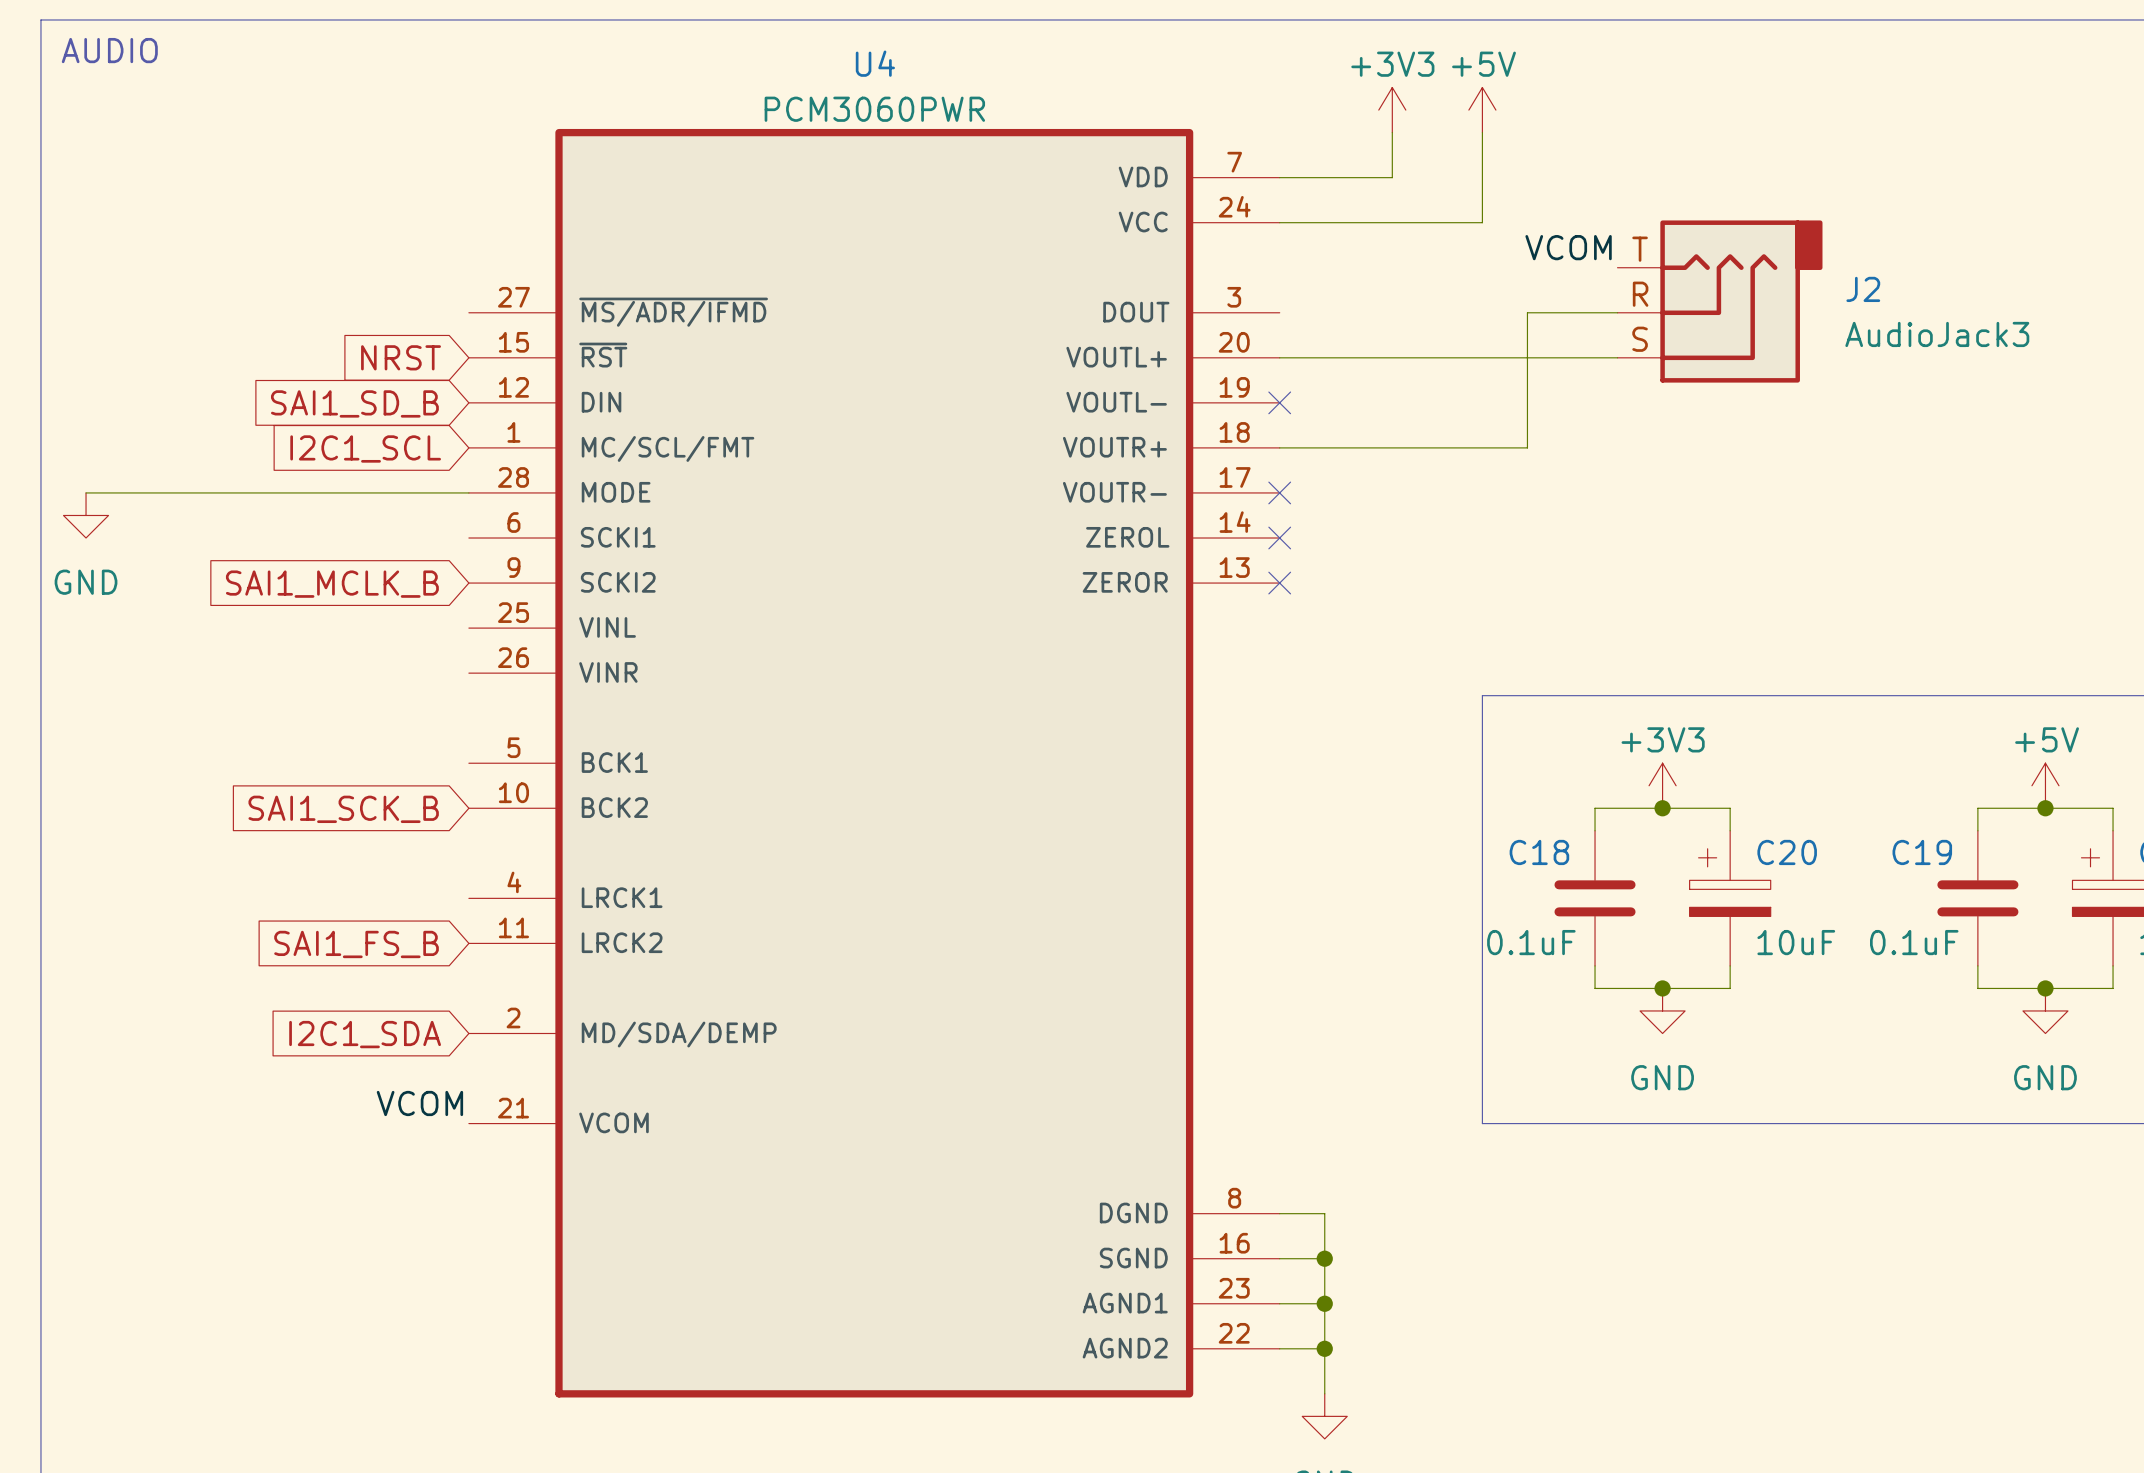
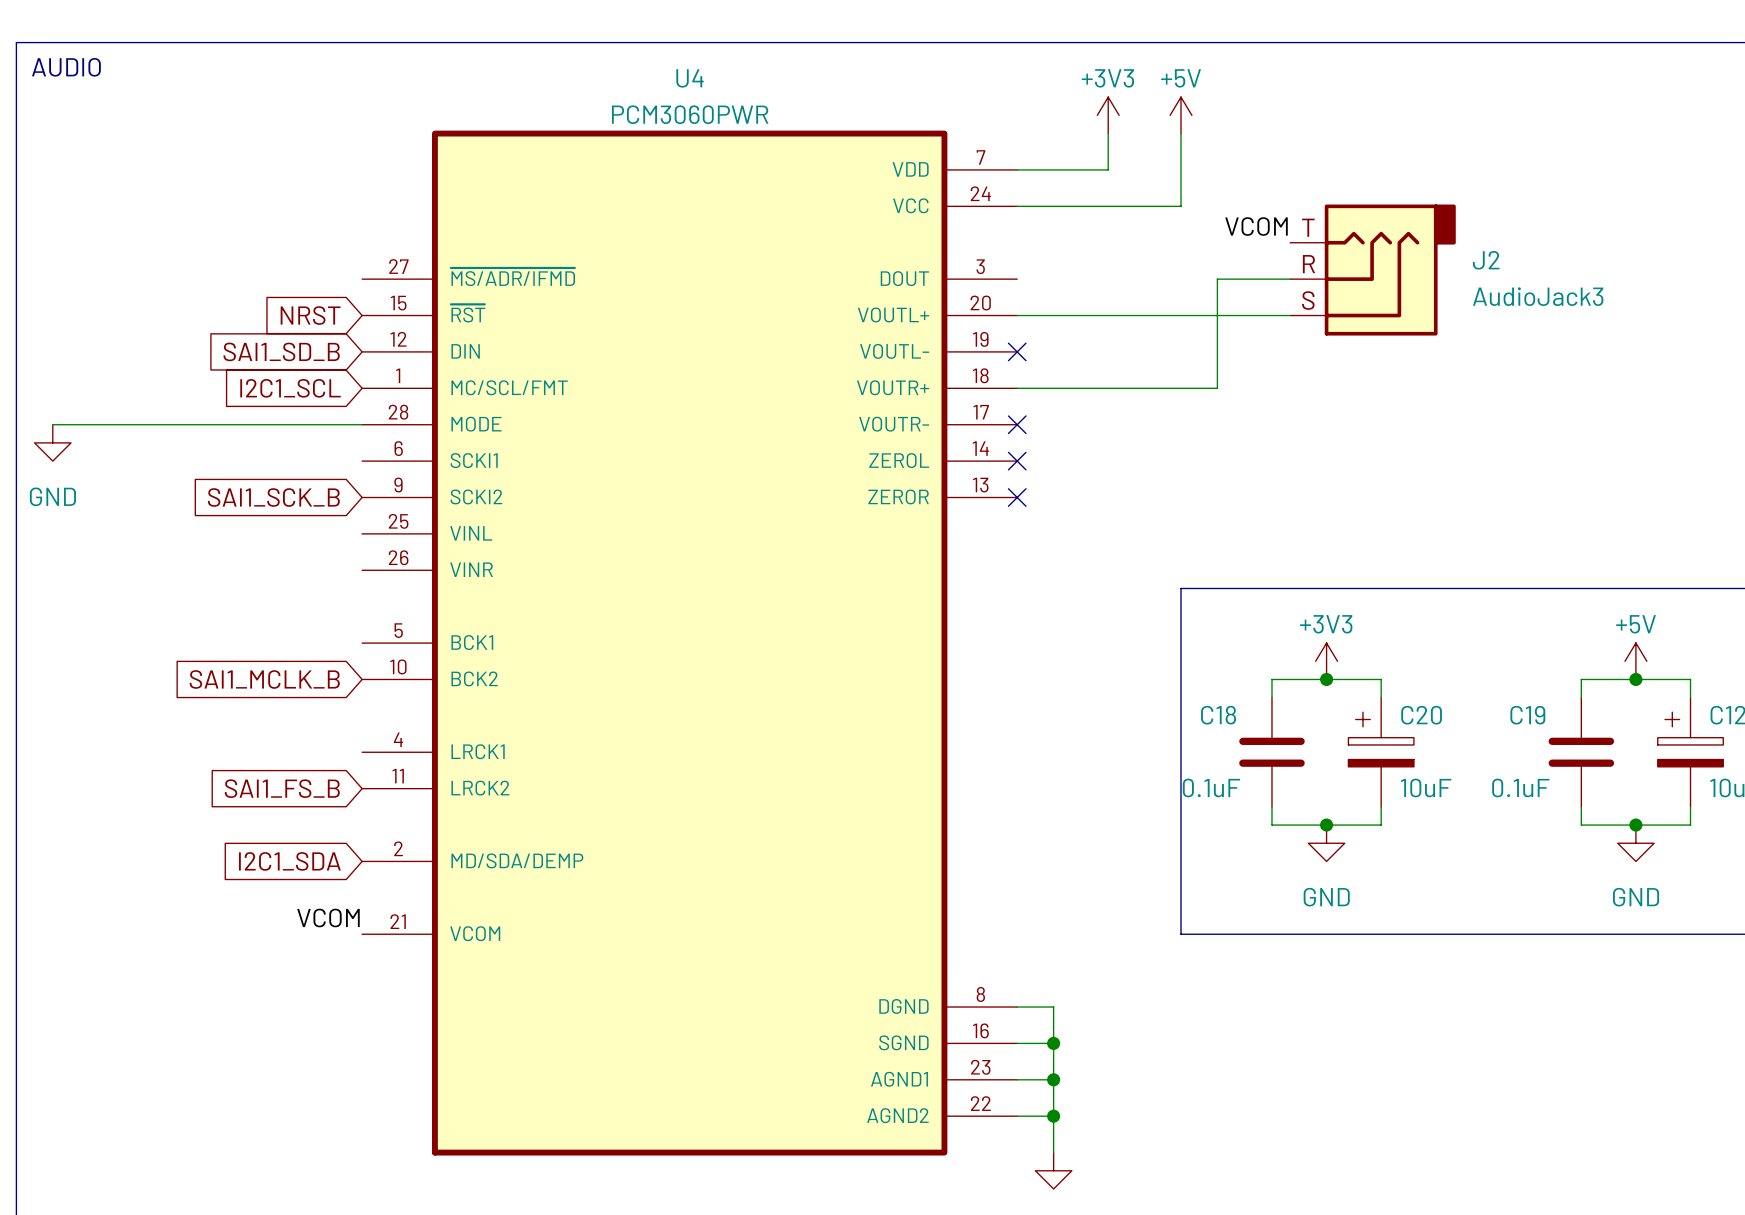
global label: SAI1_MCLK_B (332, 584) -> SAI1_SCK_B (273, 497)
global label: SAI1_SCK_B (343, 809) -> SAI1_MCLK_B (264, 679)

